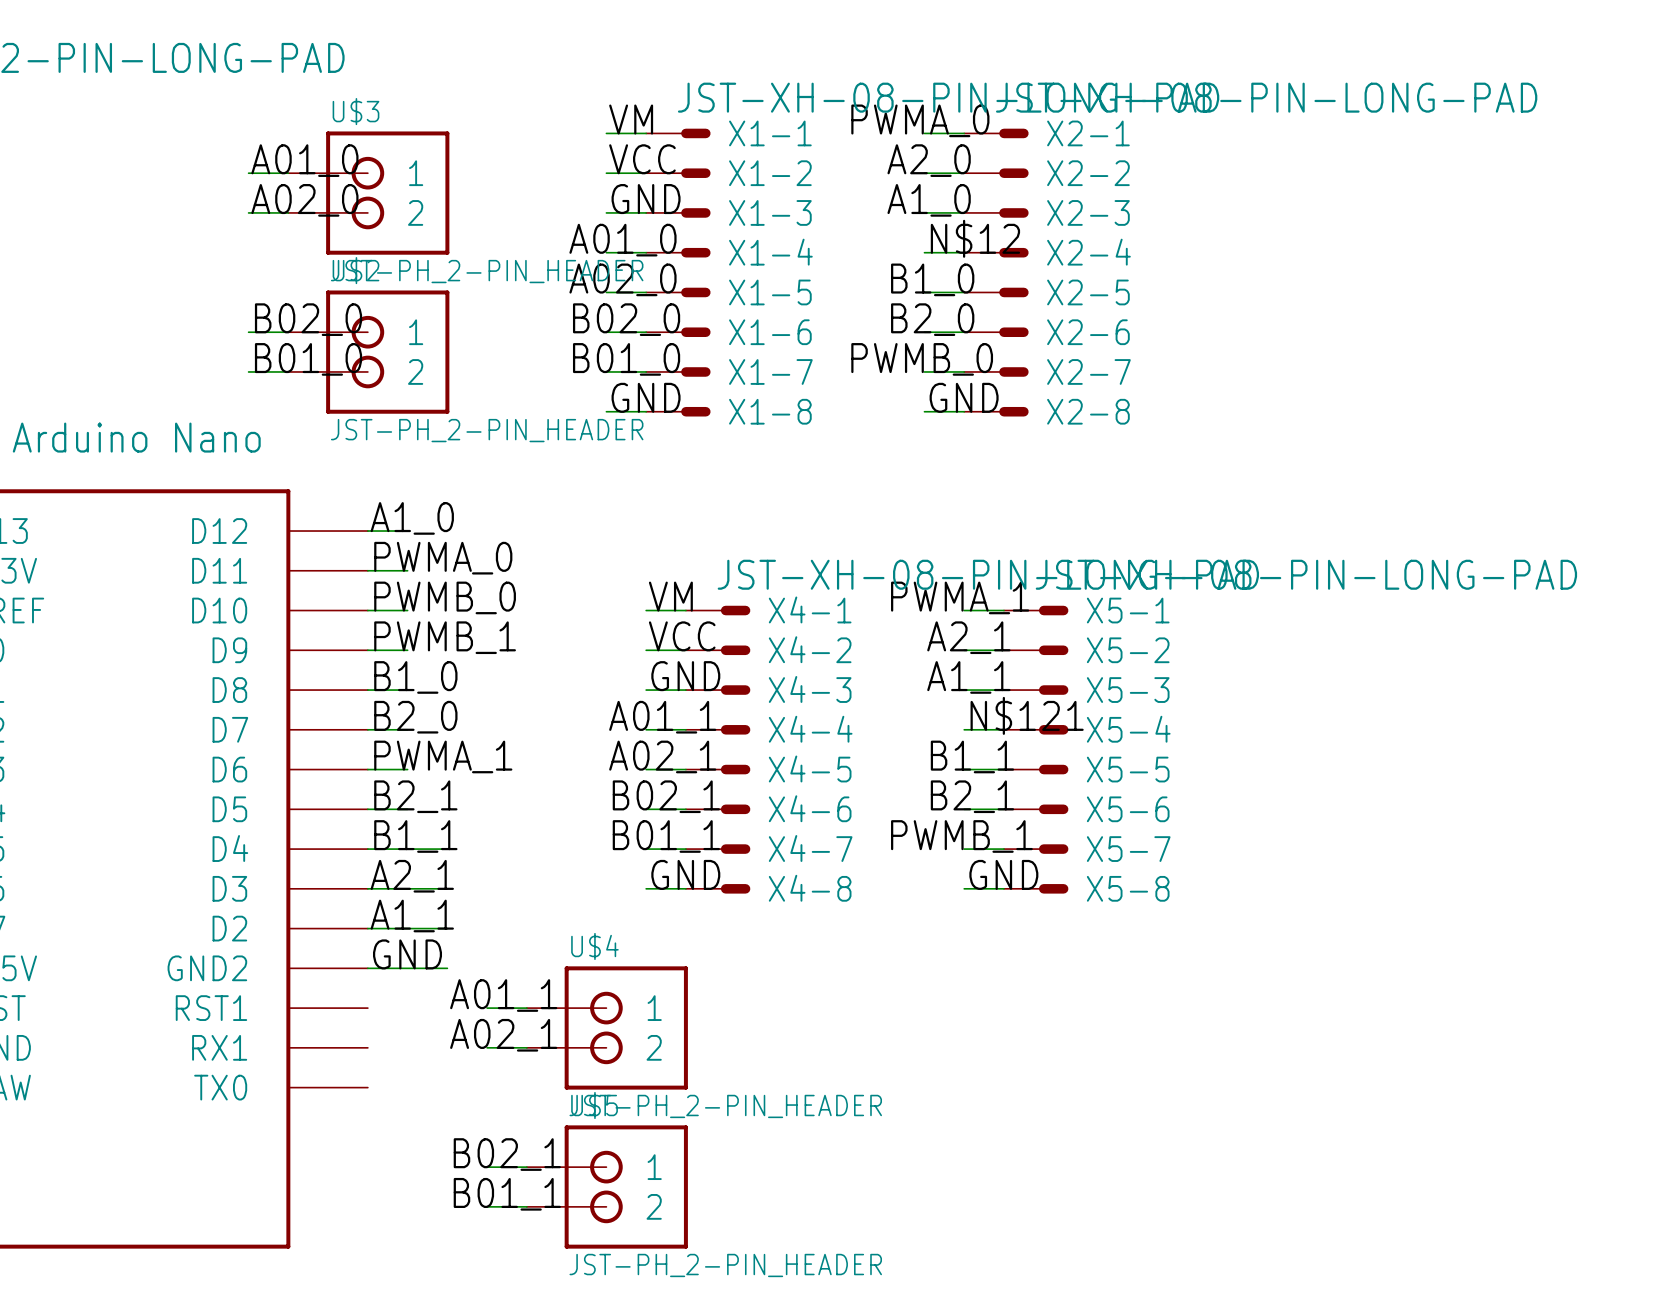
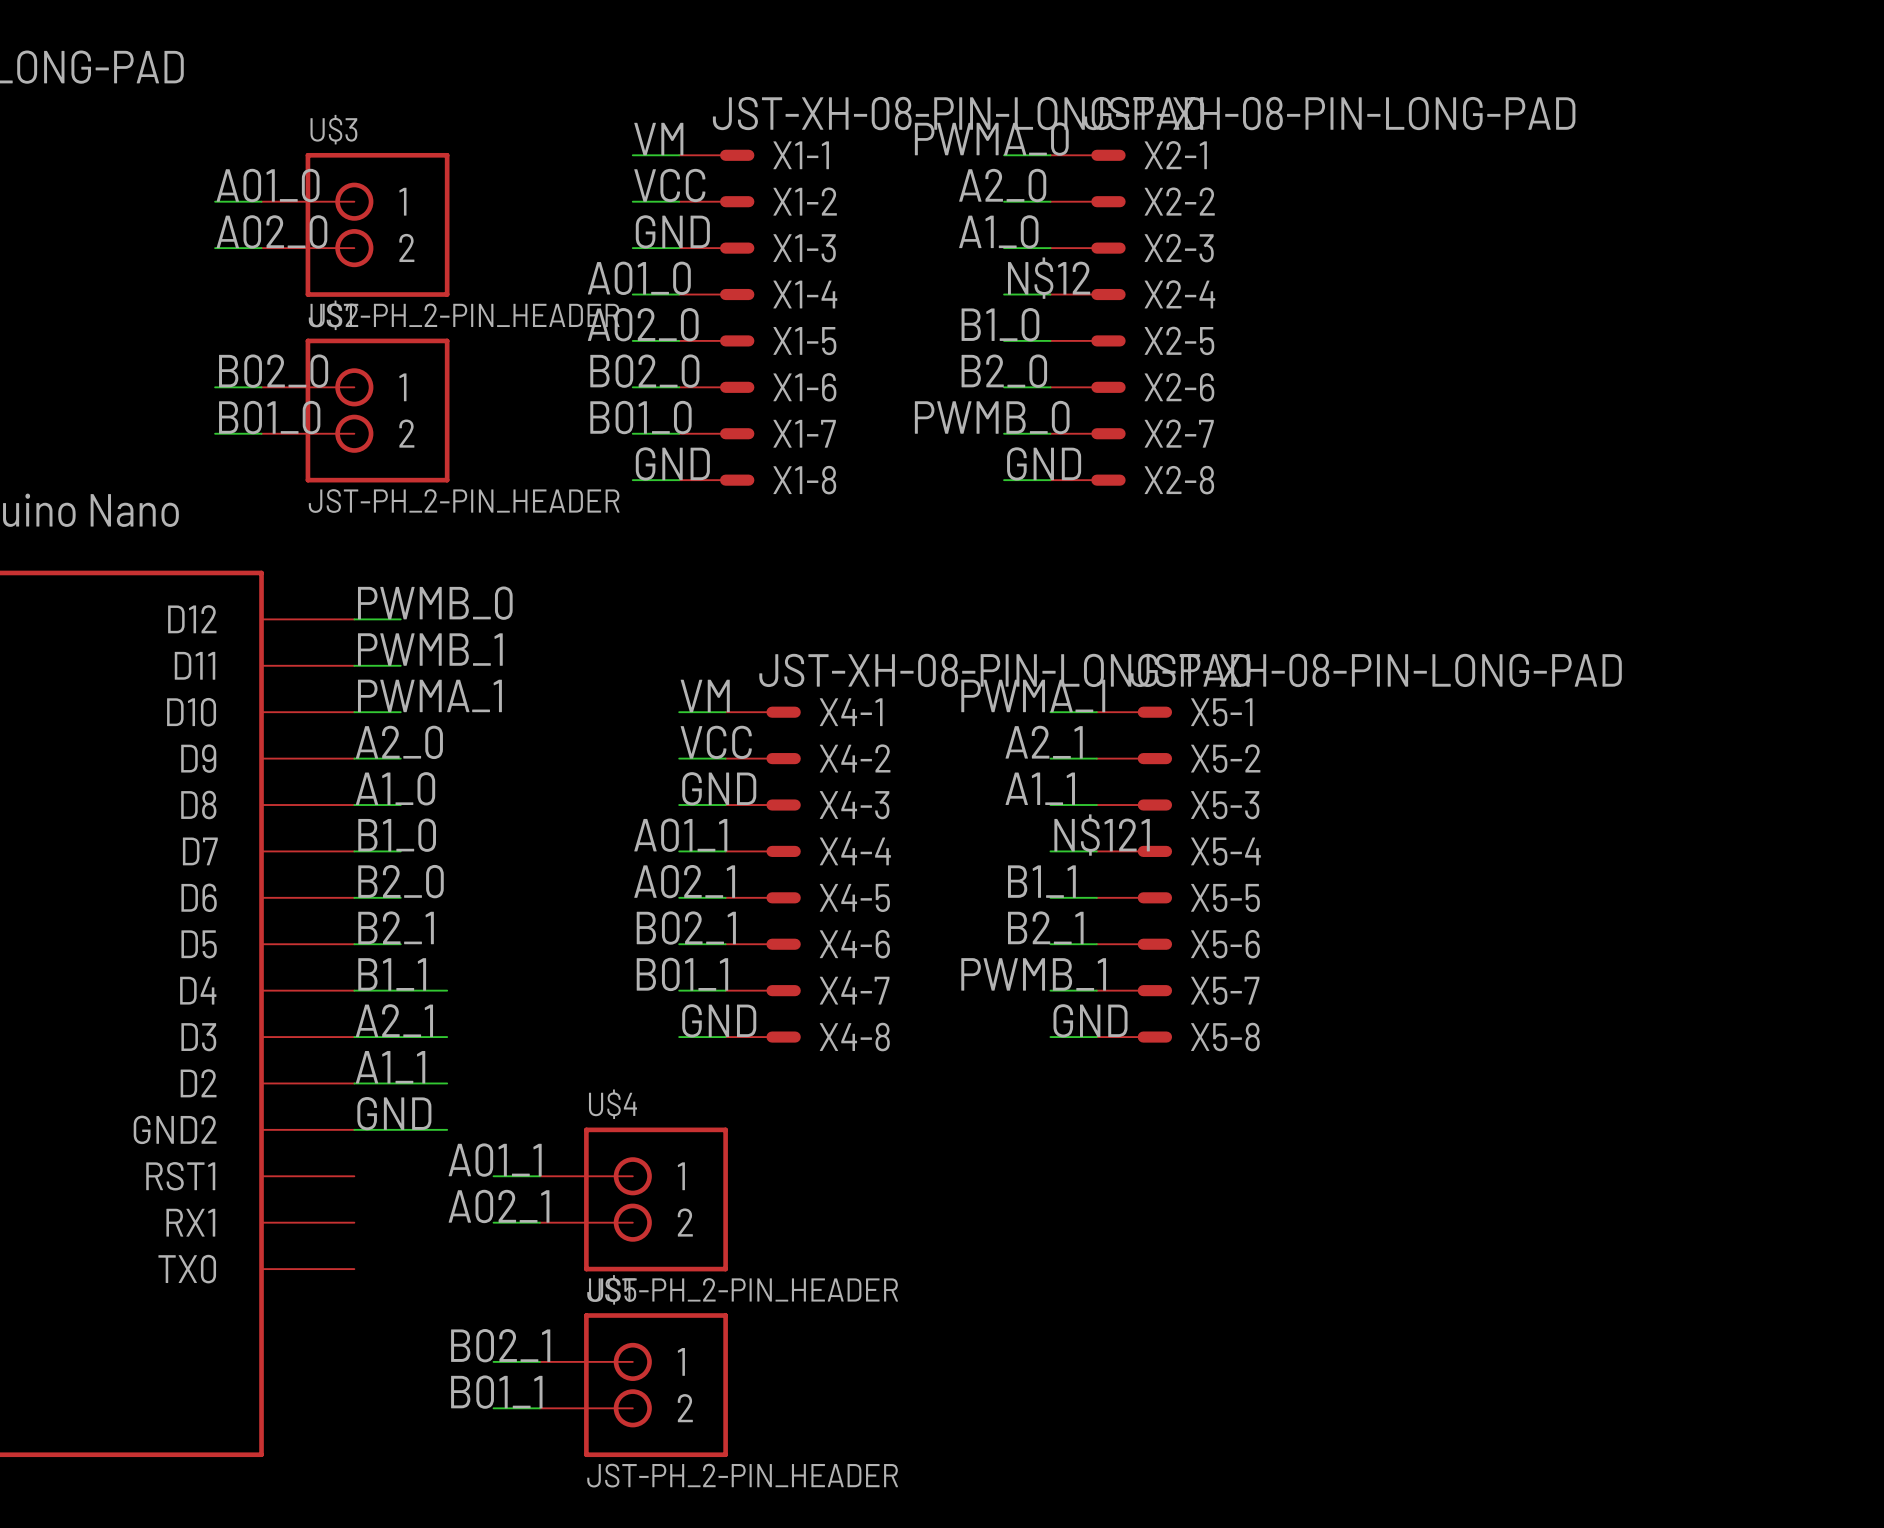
label: A1_0 (412, 518) -> PWMB_0 (435, 603)
label: PWMA_0 (443, 558) -> PWMB_1 (430, 649)
label: PWMB_0 (445, 597) -> PWMA_1 (429, 695)
label: PWMB_1 (445, 637) -> A2_0 (399, 742)
label: B1_0 (415, 677) -> A1_0 (395, 788)
label: B2_0 (415, 717) -> B1_0 (397, 835)
label: PWMA_1 (443, 756) -> B2_0 (401, 881)

